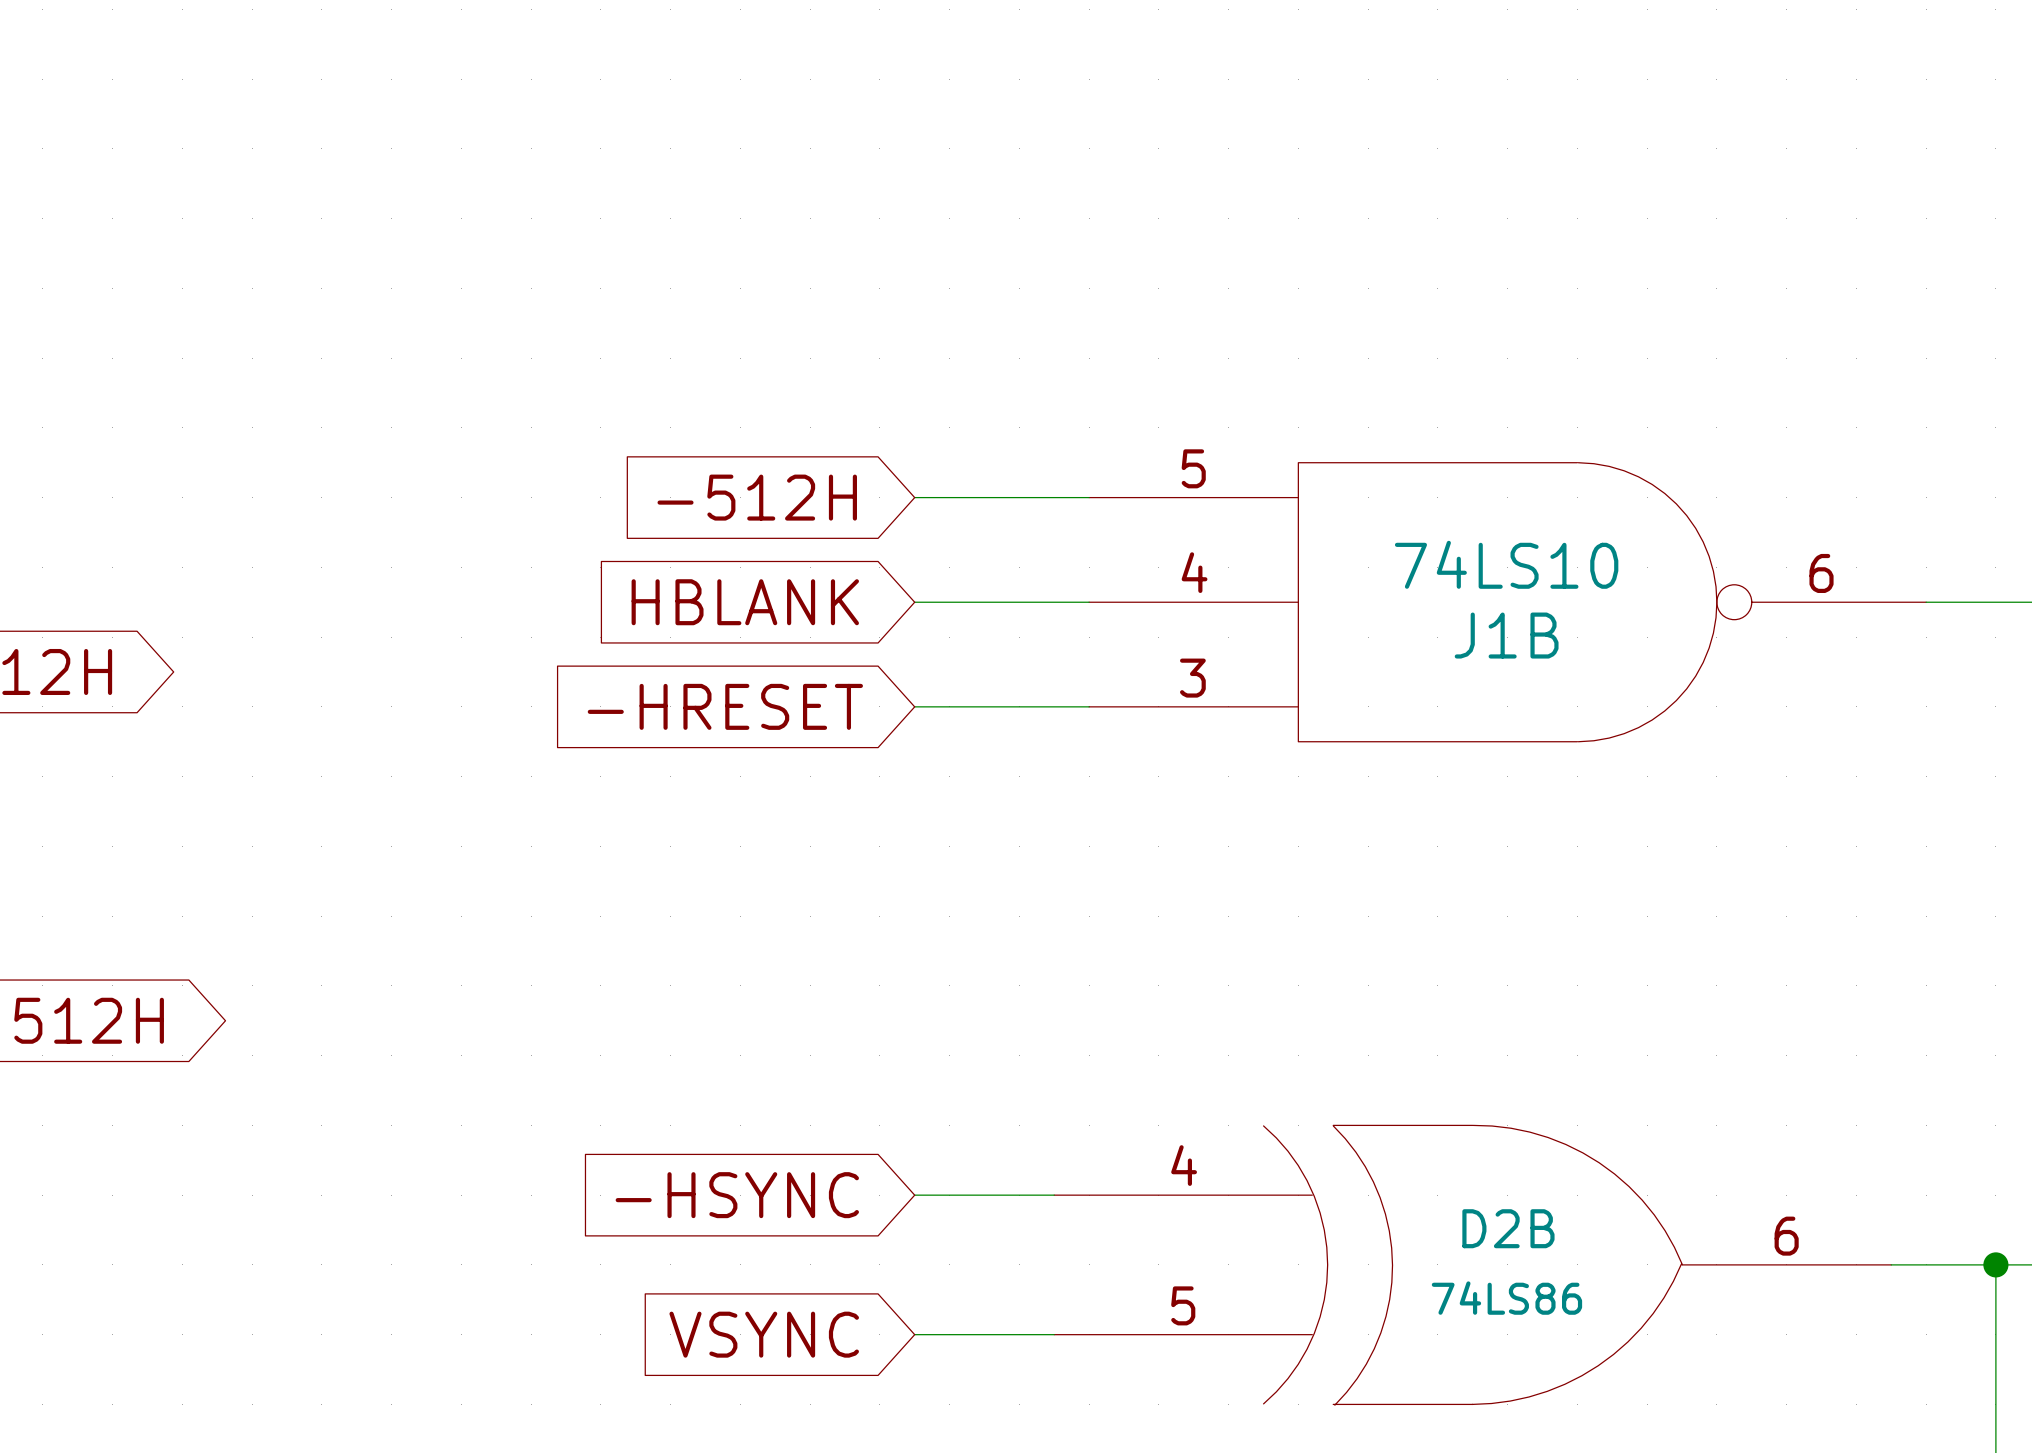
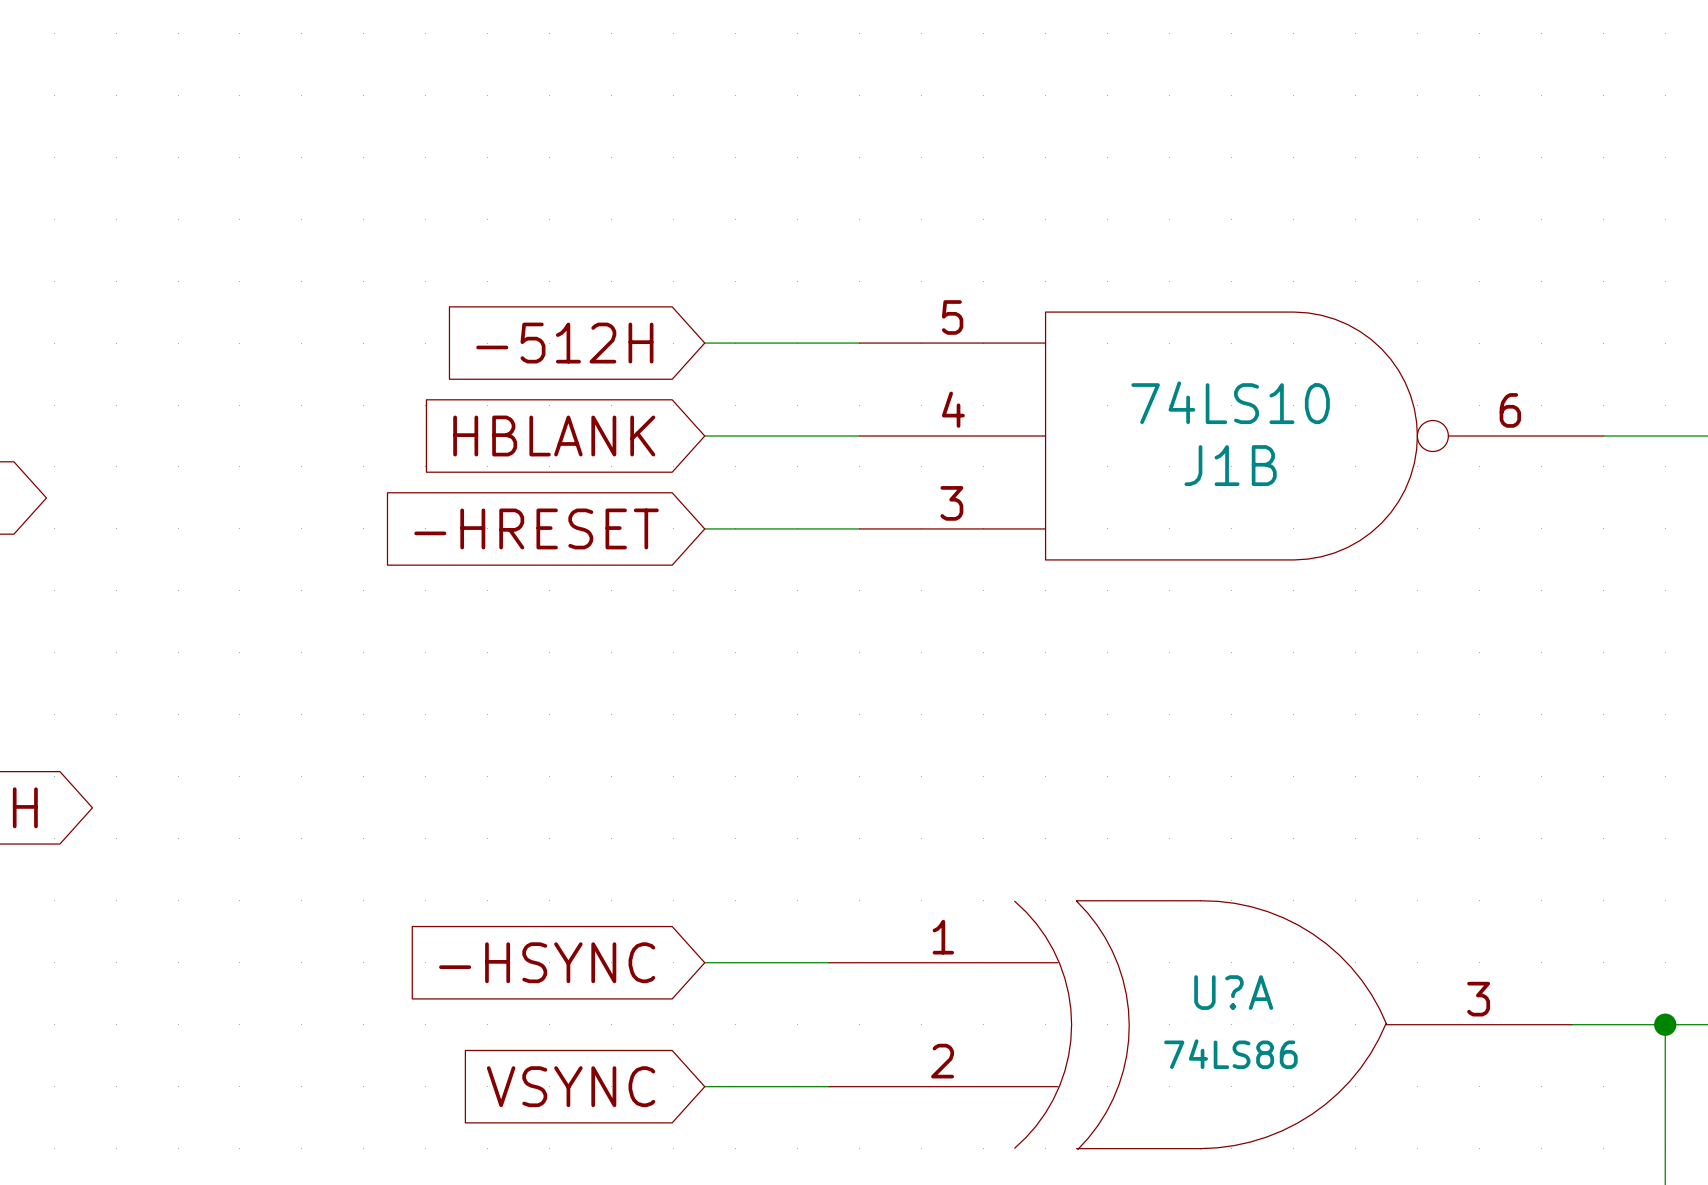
D2B pin number: 4 (1184, 1165) -> 1 (943, 937)
D2B name: D2B (1508, 1228) -> U?A (1233, 992)
D2B pin number: 6 (1786, 1236) -> 3 (1478, 999)
D2B pin number: 5 (1183, 1305) -> 2 (942, 1061)

